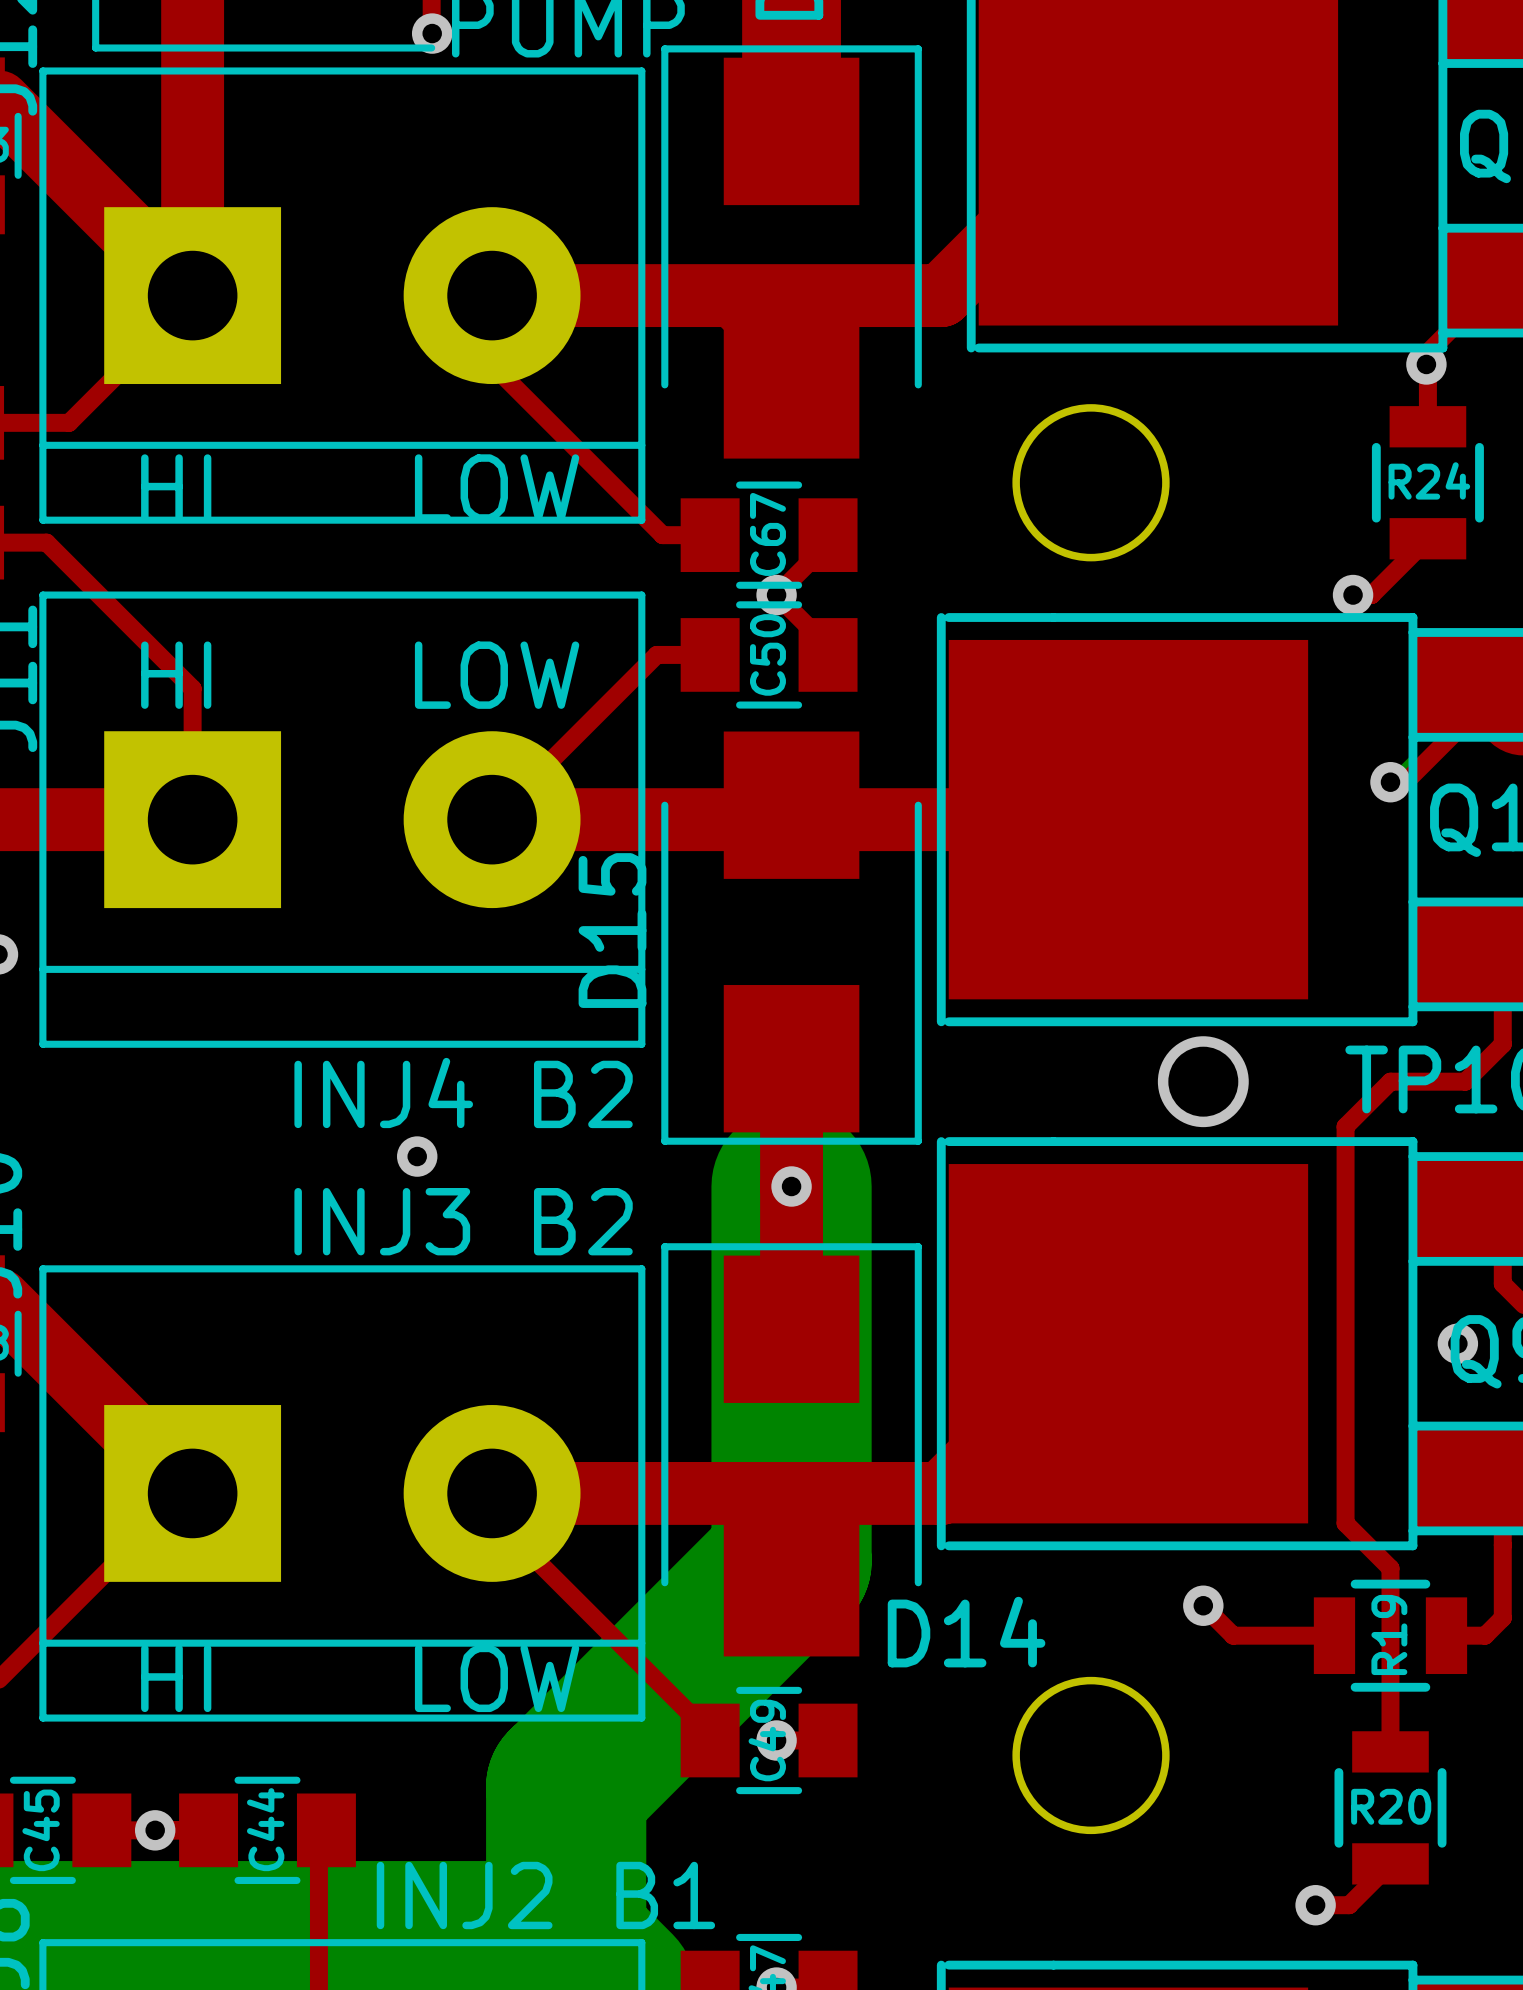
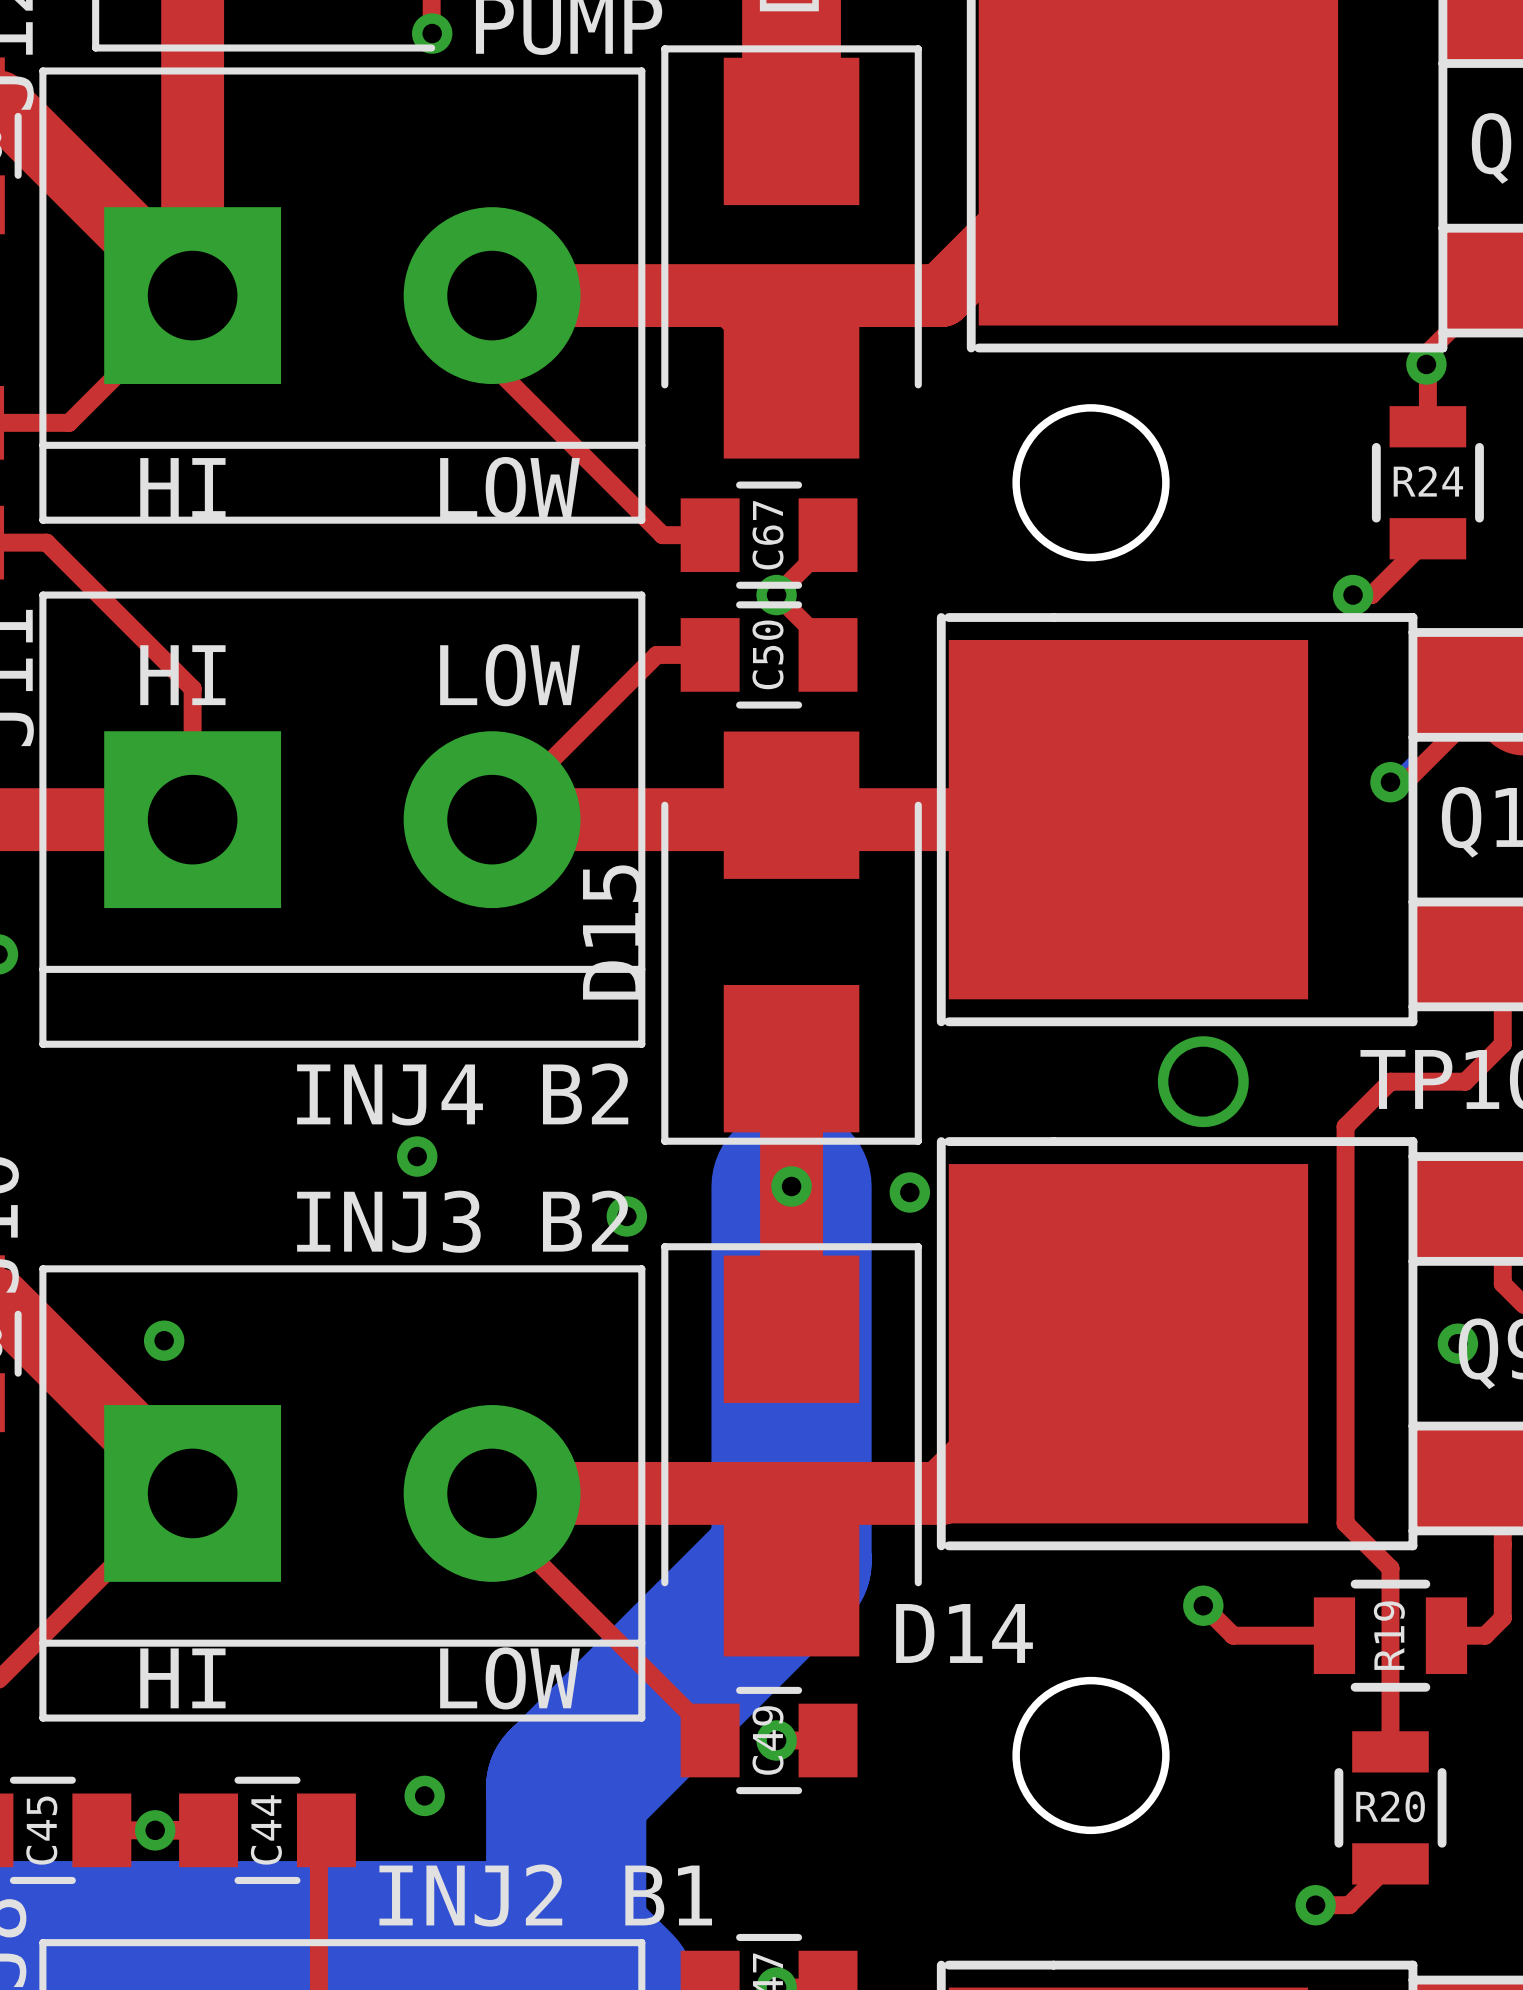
via: none -> (909, 1192)
via: none -> (626, 1216)
via: none -> (164, 1340)
via: none -> (424, 1795)

